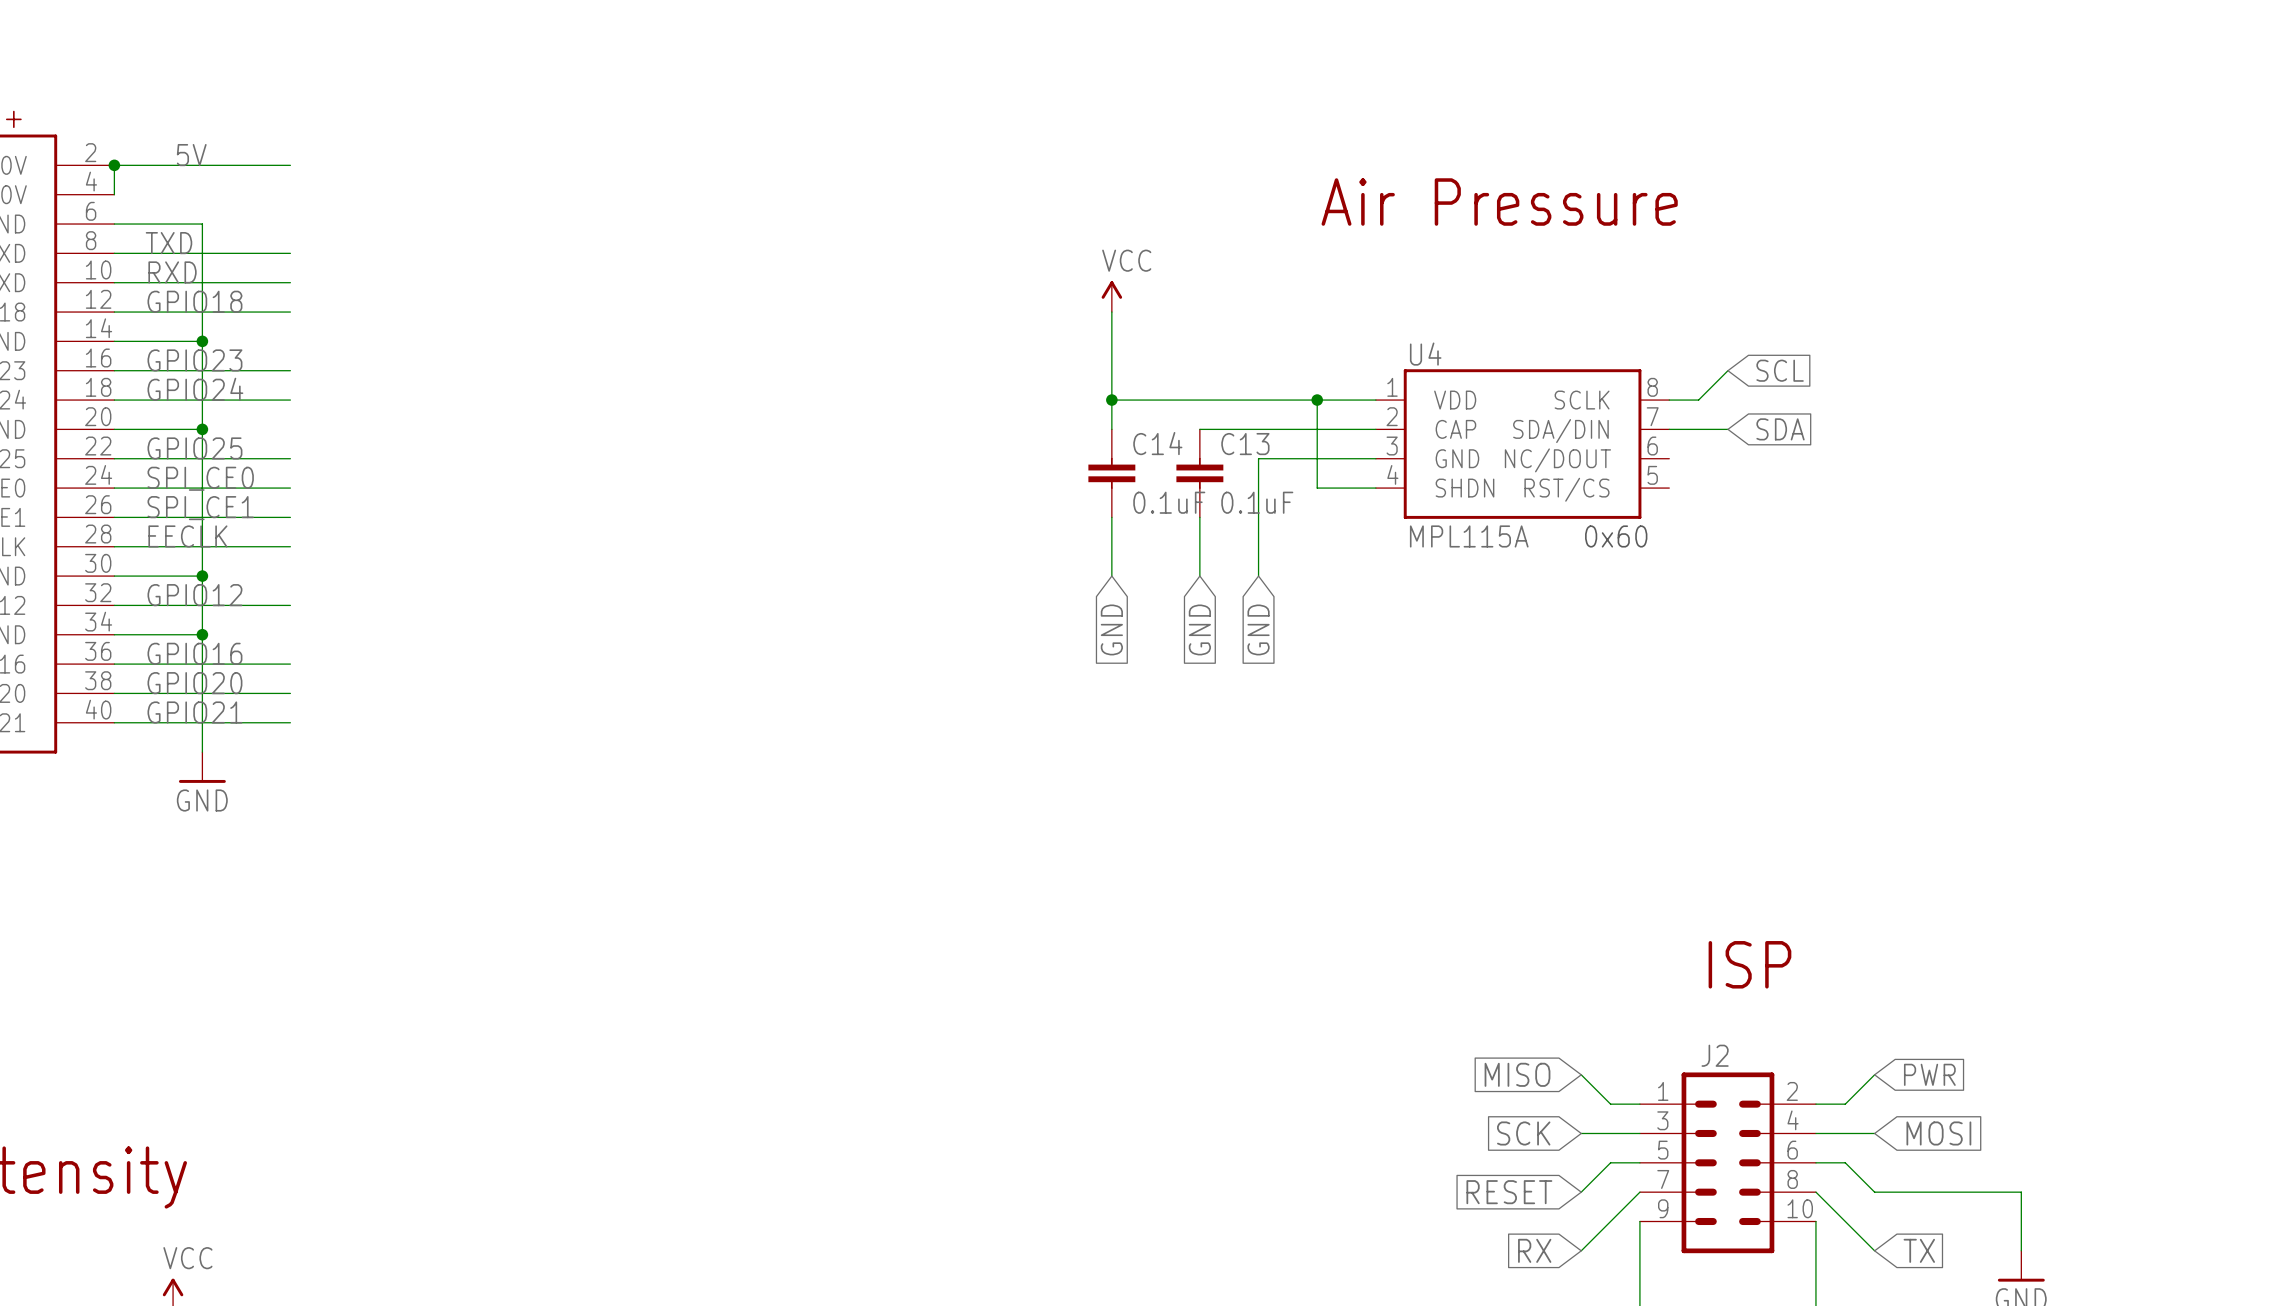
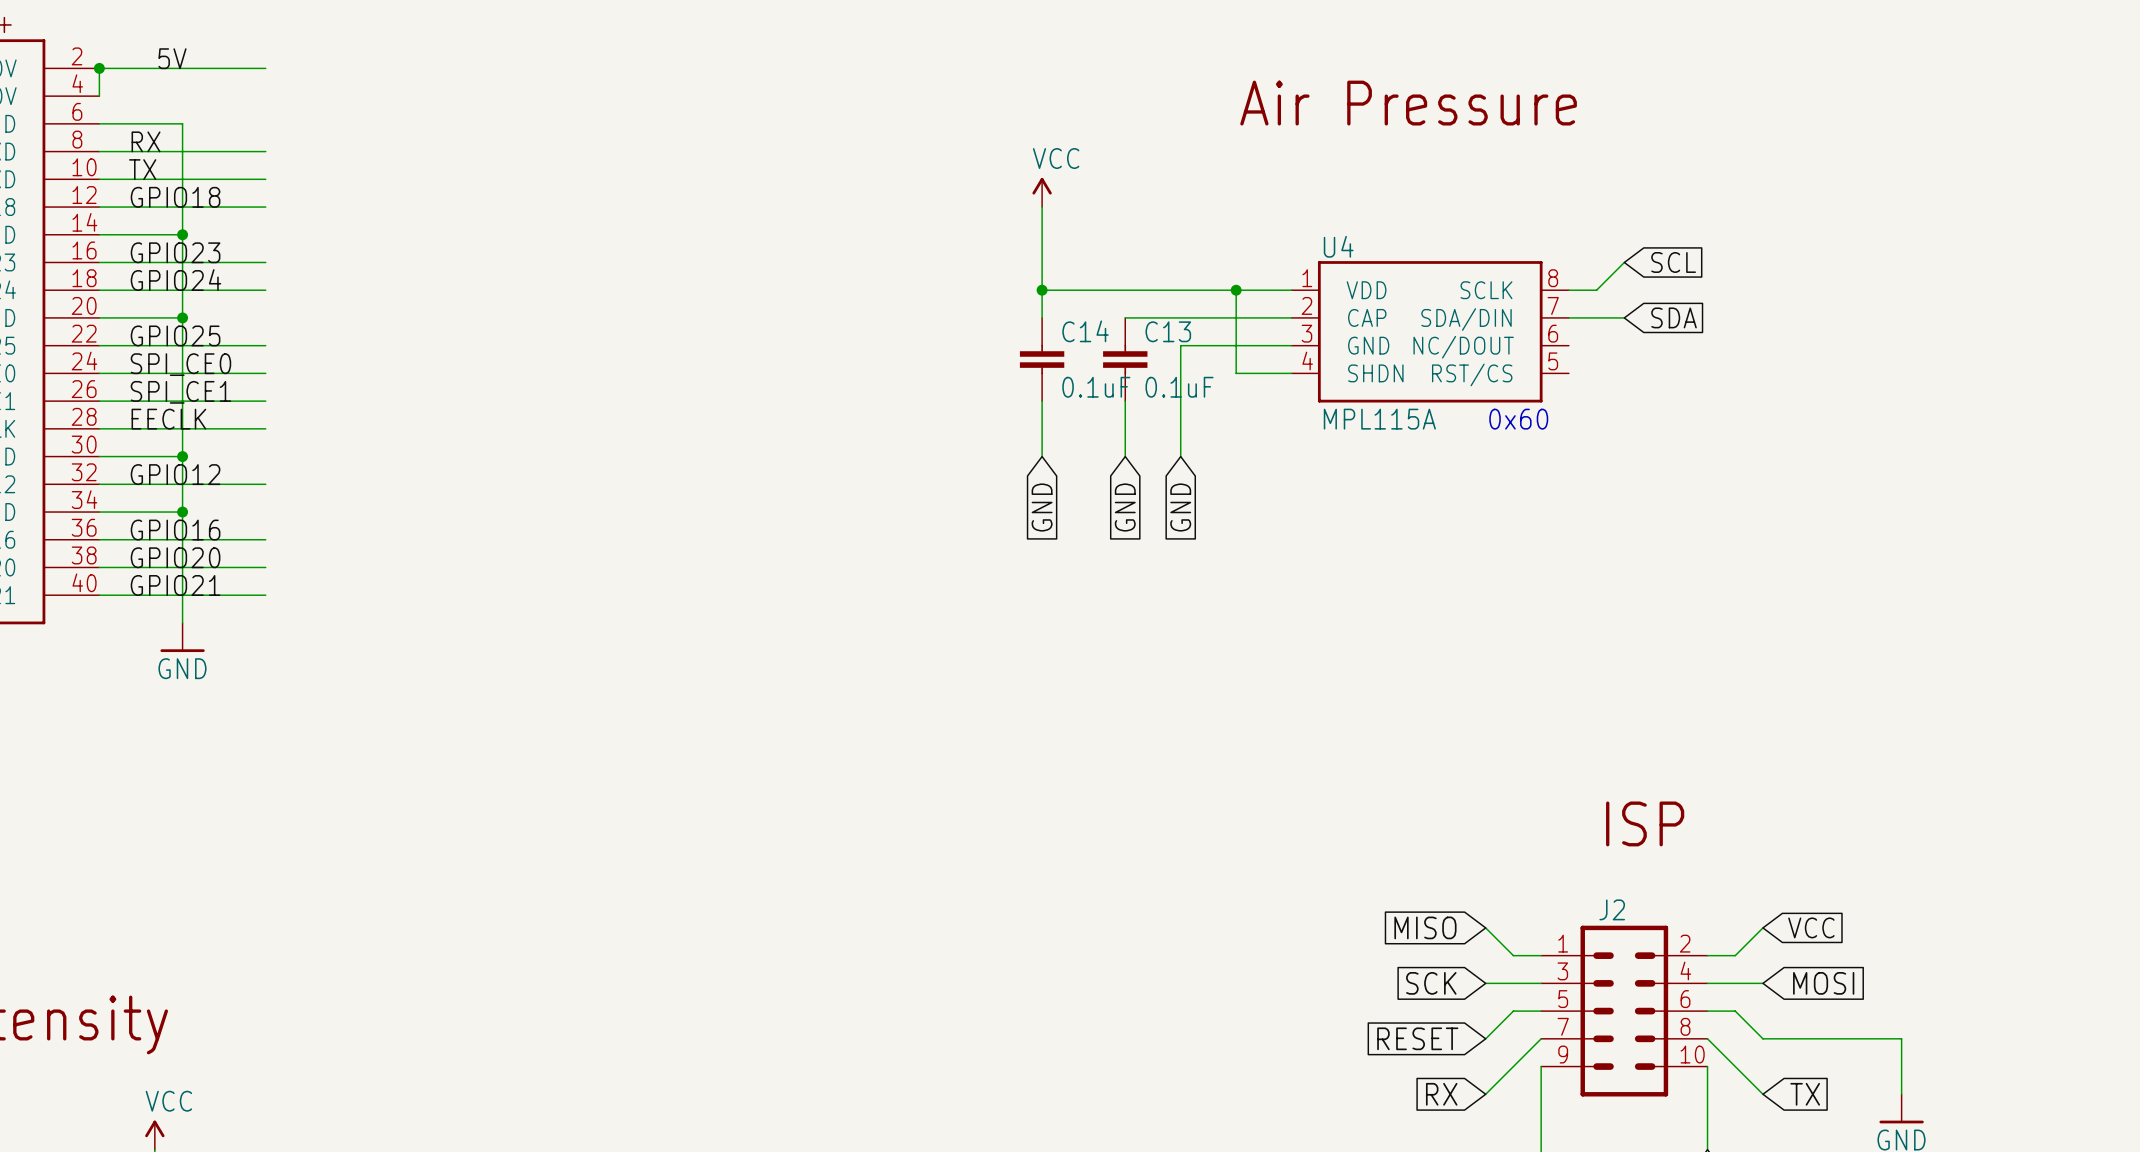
label: TXD (169, 243) -> RX (146, 141)
label: RXD (172, 272) -> TX (142, 169)
global label: PWR (1929, 1074) -> VCC (1811, 927)

